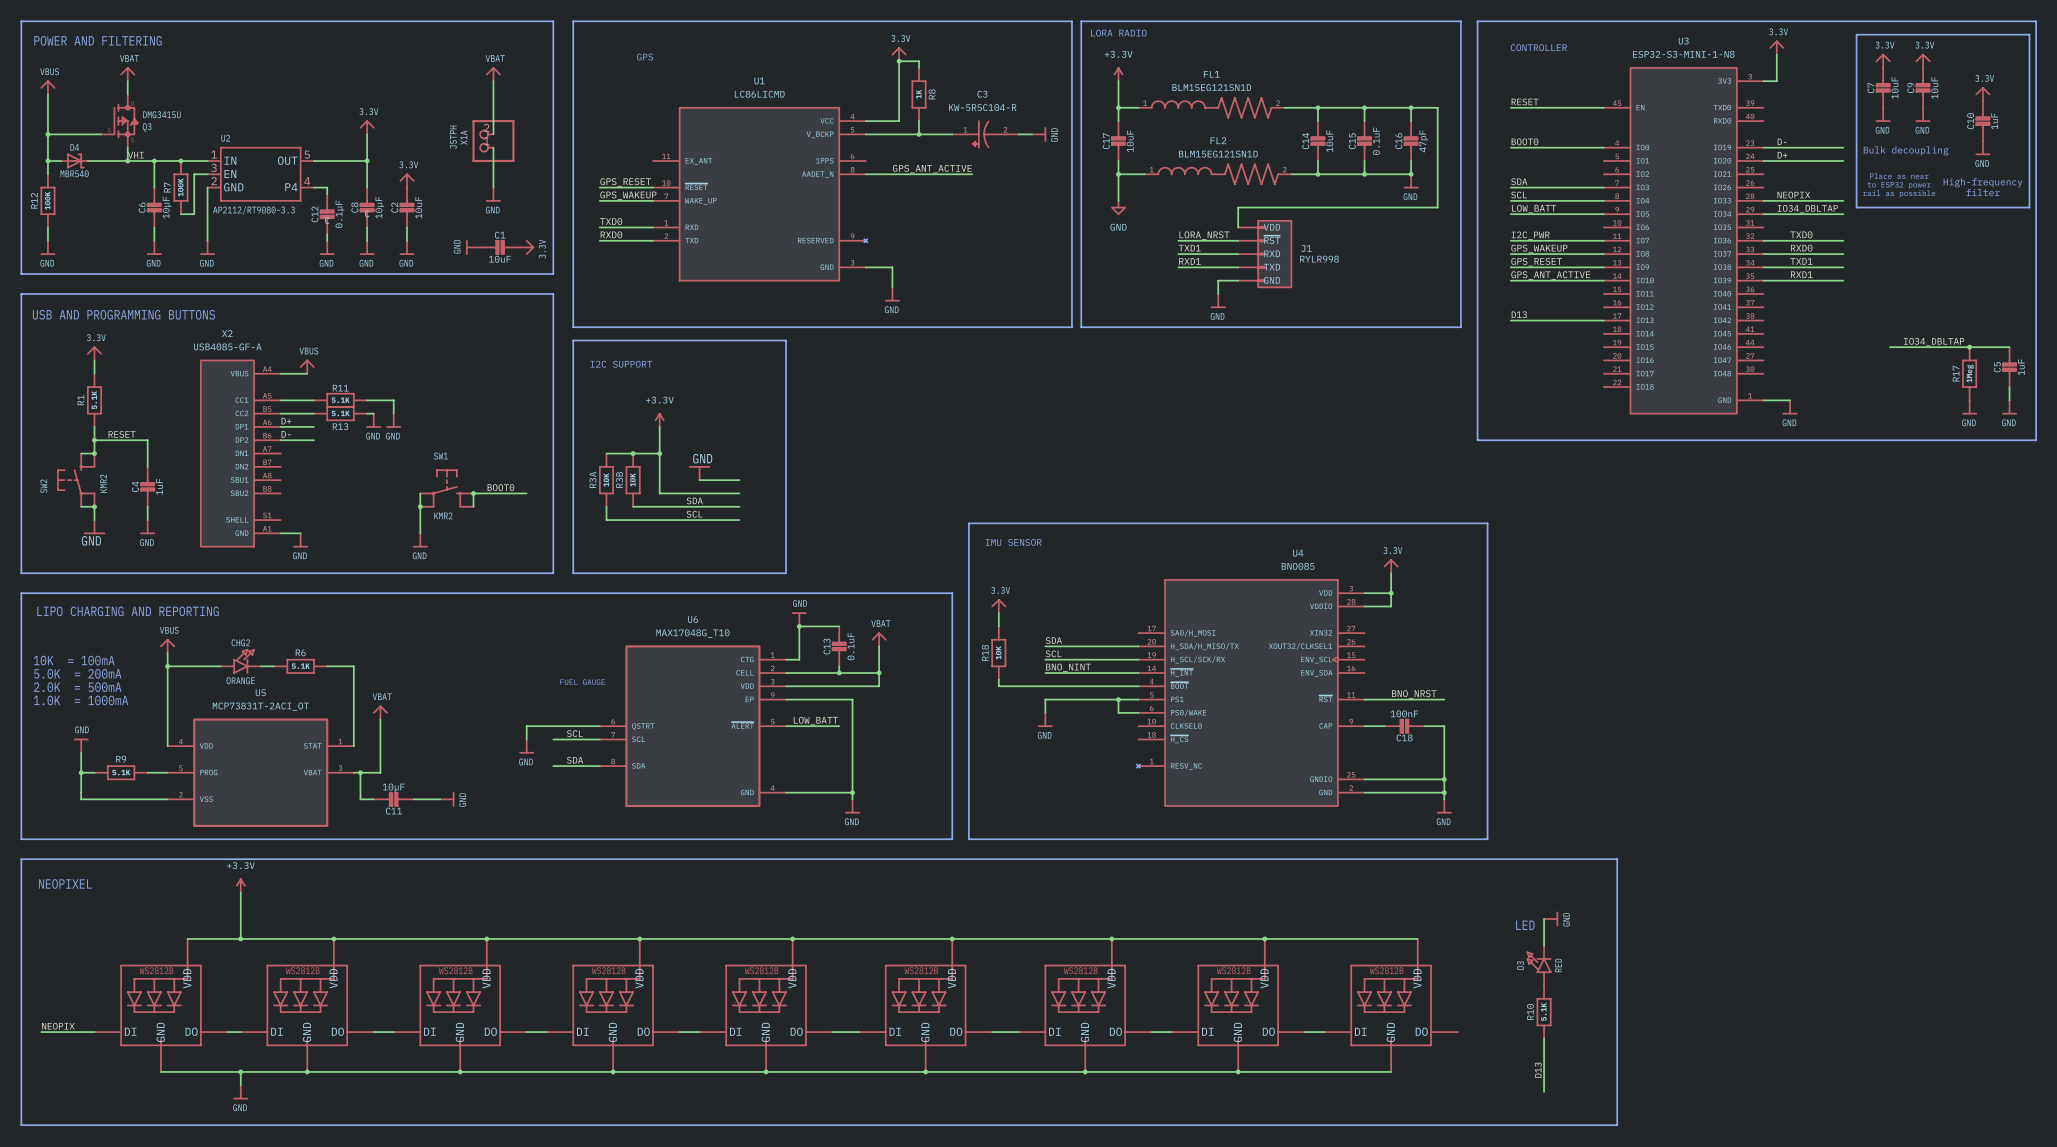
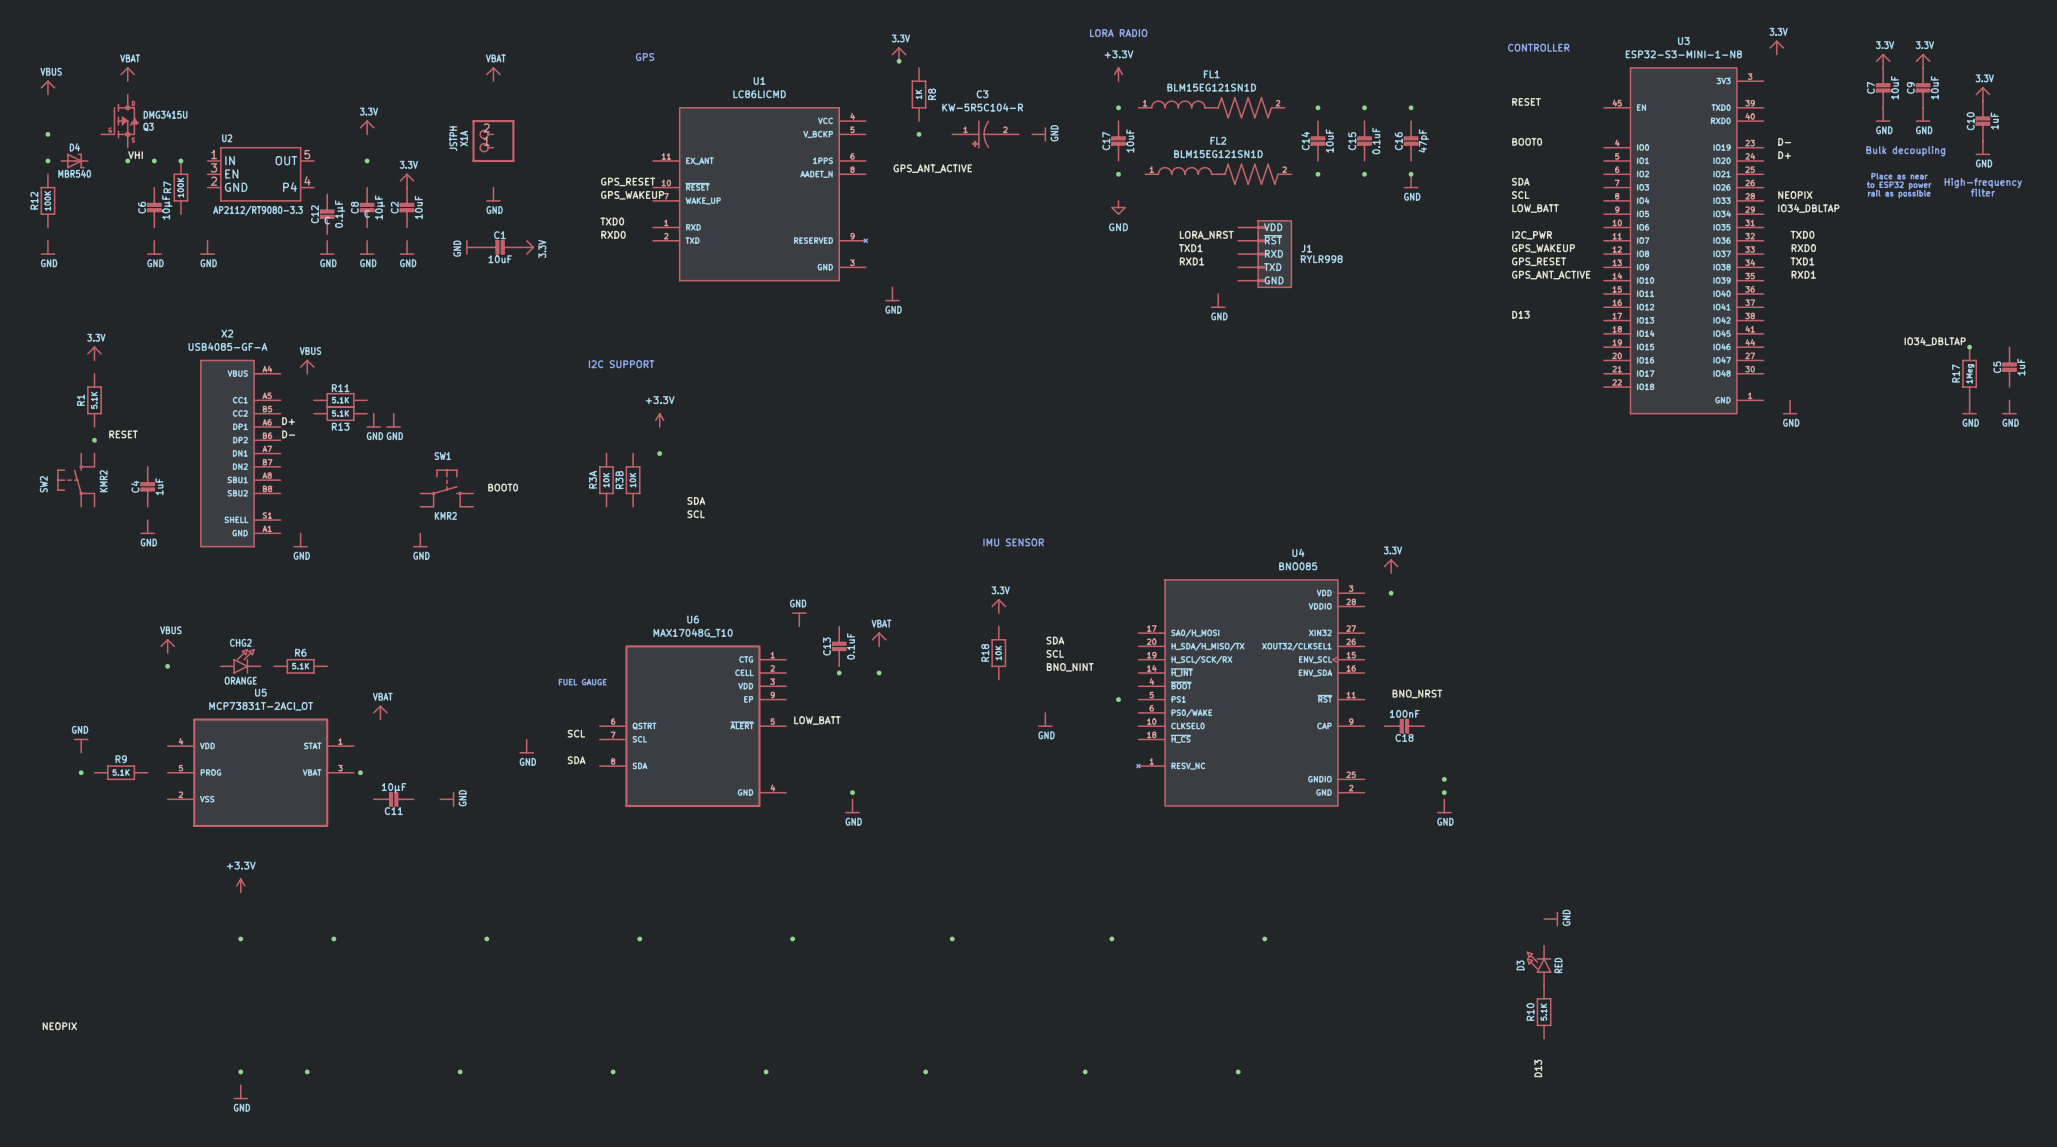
line: (21, 21) (21, 274) (553, 274) (553, 21) (21, 21) -> none
line: (573, 21) (1071, 21) (1071, 327) (573, 327) (573, 21) -> none
line: (1081, 21) (1460, 21) (1460, 327) (1081, 327) (1081, 21) -> none
line: (1477, 21) (2036, 21) (2036, 440) (1477, 440) (1477, 21) -> none
line: (1856, 34) (2029, 34) (2029, 207) (1856, 207) (1856, 34) -> none
text: POWER AND FILTERING (98, 40) -> none
wire: (1776, 54) (1776, 81) (1763, 81) -> none
wire: (919, 67) (919, 61) (899, 61) (899, 121) (865, 121) -> none
wire: (127, 81) (127, 94) -> none
wire: (493, 81) (493, 134) -> none
wire: (1118, 81) (1118, 121) -> none
wire: (47, 94) (47, 174) -> none
wire: (1118, 107) (1138, 107) -> none
wire: (1284, 107) (1437, 107) (1437, 207) (1238, 207) (1238, 227) -> none
wire: (1317, 107) (1317, 121) -> none
wire: (1364, 107) (1364, 121) -> none
wire: (1411, 107) (1411, 121) -> none
wire: (1510, 107) (1603, 107) -> none
wire: (919, 121) (919, 134) -> none
wire: (47, 134) (101, 134) -> none
wire: (367, 134) (367, 187) -> none
wire: (865, 134) (952, 134) -> none
wire: (1018, 134) (1032, 134) -> none
wire: (127, 147) (127, 160) -> none
wire: (493, 147) (493, 187) -> none
wire: (1510, 147) (1603, 147) -> none
wire: (1763, 147) (1843, 147) -> none
wire: (47, 160) (61, 160) -> none
wire: (87, 160) (207, 160) -> none
wire: (154, 160) (154, 187) -> none
wire: (313, 160) (367, 160) -> none
wire: (1118, 160) (1118, 200) -> none
wire: (1317, 160) (1317, 174) -> none
wire: (1364, 160) (1364, 174) -> none
wire: (1411, 160) (1411, 174) (1291, 174) -> none
wire: (1763, 160) (1843, 160) -> none
wire: (207, 174) (194, 174) (194, 214) (180, 214) -> none
wire: (865, 174) (972, 174) -> none
wire: (1118, 174) (1145, 174) -> none
wire: (207, 187) (207, 240) -> none
wire: (313, 187) (327, 187) (327, 194) -> none
wire: (599, 187) (653, 187) -> none
wire: (1510, 187) (1603, 187) -> none
wire: (599, 200) (653, 200) -> none
wire: (1510, 200) (1603, 200) -> none
wire: (1763, 200) (1843, 200) -> none
wire: (1510, 214) (1603, 214) -> none
wire: (1763, 214) (1843, 214) -> none
wire: (47, 227) (47, 240) -> none
wire: (154, 227) (154, 240) -> none
wire: (367, 227) (367, 240) -> none
wire: (407, 227) (407, 240) -> none
wire: (599, 227) (653, 227) -> none
wire: (327, 234) (327, 240) -> none
wire: (599, 240) (653, 240) -> none
wire: (1178, 240) (1238, 240) -> none
wire: (1510, 240) (1603, 240) -> none
wire: (1763, 240) (1843, 240) -> none
wire: (1178, 254) (1238, 254) -> none
wire: (1510, 254) (1603, 254) -> none
wire: (1763, 254) (1843, 254) -> none
wire: (865, 267) (892, 267) (892, 287) -> none
wire: (1178, 267) (1238, 267) -> none
wire: (1510, 267) (1603, 267) -> none
wire: (1763, 267) (1843, 267) -> none
wire: (1238, 280) (1218, 280) (1218, 293) -> none
wire: (1510, 280) (1603, 280) -> none
wire: (1763, 280) (1843, 280) -> none
line: (21, 293) (553, 293) (553, 573) (21, 573) (21, 293) -> none
text: USB AND PROGRAMMING BUTTONS (123, 314) -> none
wire: (1510, 320) (1603, 320) -> none
line: (573, 340) (573, 573) (786, 573) (786, 340) (573, 340) -> none
wire: (1889, 347) (2009, 347) -> none
wire: (94, 360) (94, 373) -> none
wire: (280, 373) (307, 373) -> none
wire: (2009, 387) (2009, 400) -> none
wire: (280, 400) (313, 400) -> none
wire: (367, 400) (393, 400) (393, 413) -> none
wire: (1763, 400) (1790, 400) -> none
wire: (280, 413) (313, 413) -> none
wire: (367, 413) (373, 413) -> none
wire: (94, 426) (94, 453) (81, 453) -> none
wire: (280, 426) (313, 426) -> none
wire: (659, 426) (659, 493) (739, 493) -> none
wire: (94, 440) (147, 440) (147, 466) -> none
wire: (280, 440) (313, 440) -> none
junction: (94, 453) -> none
wire: (606, 453) (659, 453) -> none
junction: (633, 453) -> none
power symbol: GND (699, 473) -> none
wire: (699, 480) (739, 480) -> none
wire: (420, 493) (420, 533) -> none
junction: (473, 493) -> none
wire: (526, 493) (473, 493) (473, 506) -> none
wire: (81, 506) (94, 506) (94, 520) -> none
junction: (94, 506) -> none
wire: (147, 506) (147, 520) -> none
junction: (420, 506) -> none
wire: (606, 506) (606, 520) (739, 520) -> none
wire: (633, 506) (739, 506) -> none
line: (968, 523) (1487, 523) (1487, 839) (968, 839) (968, 523) -> none
power symbol: GND (94, 527) -> none
wire: (280, 533) (300, 533) -> none
wire: (1391, 573) (1391, 606) (1364, 606) -> none
line: (21, 593) (21, 839) (952, 839) (952, 593) (21, 593) -> none
wire: (1364, 593) (1391, 593) -> none
text: LIPO CHARGING AND REPORTING (128, 611) -> none
wire: (998, 613) (998, 626) -> none
junction: (799, 626) -> none
wire: (839, 626) (799, 626) (799, 659) (786, 659) -> none
wire: (879, 646) (879, 686) (786, 686) -> none
wire: (1045, 646) (1138, 646) -> none
wire: (167, 653) (167, 746) -> none
wire: (1045, 659) (1138, 659) -> none
text: 10K = 100mA (74, 660) -> none
wire: (167, 666) (220, 666) -> none
wire: (260, 666) (274, 666) -> none
wire: (327, 666) (353, 666) (353, 746) -> none
wire: (839, 666) (839, 672) -> none
wire: (786, 672) (879, 672) -> none
wire: (1045, 672) (1138, 672) -> none
text: 5.0K = 200mA (77, 673) -> none
wire: (998, 679) (998, 686) (1138, 686) -> none
text: 2.0K = 500mA (77, 687) -> none
wire: (786, 699) (852, 699) (852, 799) -> none
wire: (1118, 699) (1118, 712) (1138, 712) -> none
wire: (1138, 699) (1045, 699) (1045, 712) -> none
wire: (1364, 699) (1444, 699) -> none
text: 1.0K = 1000mA (81, 700) -> none
wire: (380, 719) (380, 772) (353, 772) -> none
wire: (599, 726) (526, 726) (526, 739) -> none
wire: (786, 726) (839, 726) -> none
wire: (1364, 726) (1384, 726) -> none
wire: (1424, 726) (1444, 726) (1444, 799) -> none
wire: (553, 739) (599, 739) -> none
wire: (81, 752) (81, 799) (167, 799) -> none
wire: (553, 766) (599, 766) -> none
wire: (81, 772) (94, 772) -> none
wire: (147, 772) (167, 772) -> none
wire: (360, 772) (360, 799) (373, 799) -> none
wire: (1364, 779) (1444, 779) -> none
wire: (786, 792) (852, 792) -> none
wire: (1364, 792) (1444, 792) -> none
wire: (413, 799) (440, 799) -> none
line: (21, 859) (21, 1125) (1617, 1125) (1617, 859) (21, 859) -> none
text: NEOPIXEL (65, 883) -> none
wire: (240, 892) (240, 938) -> none
wire: (1544, 919) (1544, 945) -> none
text: LED (1525, 925) -> none
wire: (187, 938) (1417, 938) -> none
part: (160, 1005) -> none
part: (307, 1005) -> none
part: (460, 1005) -> none
part: (613, 1005) -> none
part: (766, 1005) -> none
part: (925, 1005) -> none
part: (1085, 1005) -> none
part: (1238, 1005) -> none
part: (1391, 1005) -> none
wire: (41, 1032) (94, 1032) -> none
wire: (227, 1032) (240, 1032) -> none
wire: (373, 1032) (393, 1032) -> none
wire: (526, 1032) (546, 1032) -> none
wire: (679, 1032) (699, 1032) -> none
wire: (832, 1032) (859, 1032) -> none
wire: (992, 1032) (1018, 1032) -> none
wire: (1151, 1032) (1171, 1032) -> none
wire: (1304, 1032) (1324, 1032) -> none
wire: (1544, 1038) (1544, 1091) -> none
wire: (160, 1071) (1391, 1071) -> none
wire: (240, 1071) (240, 1085) -> none

